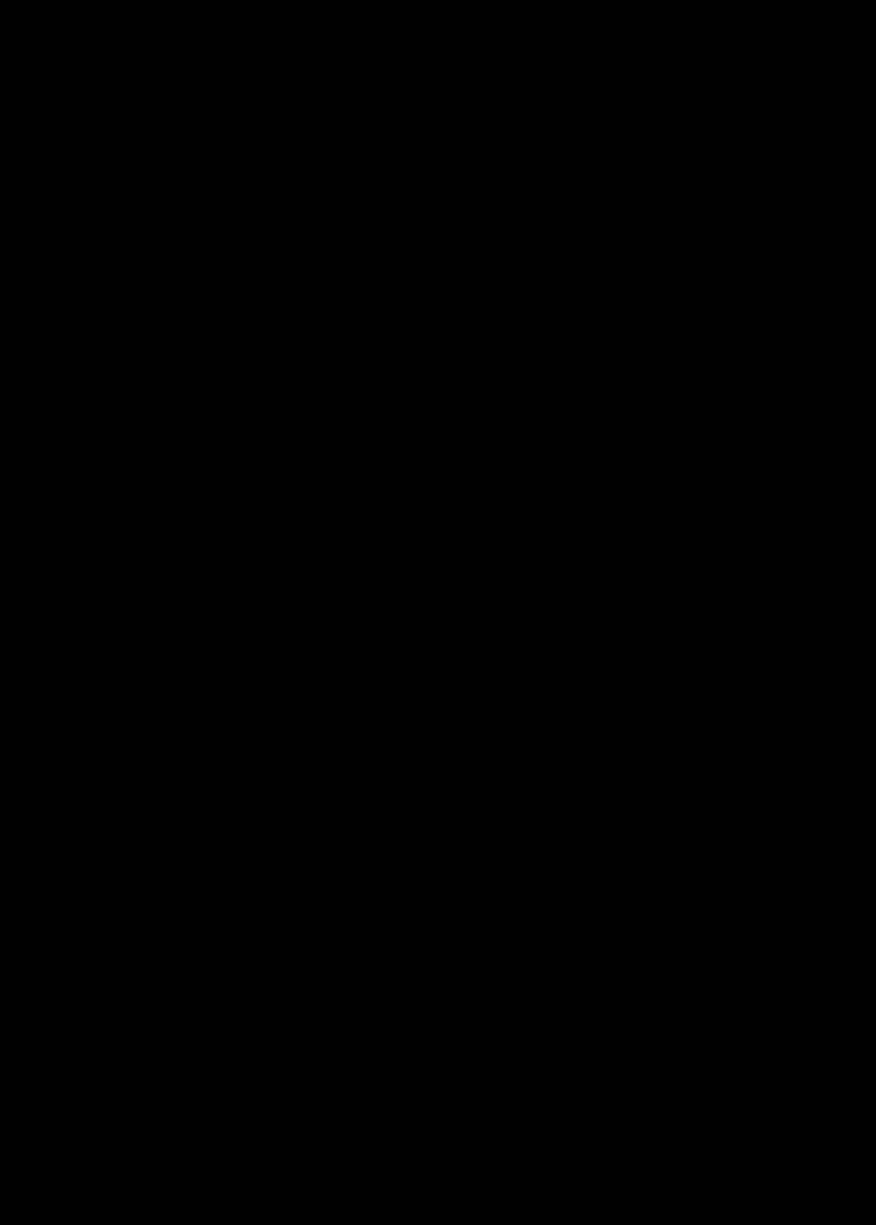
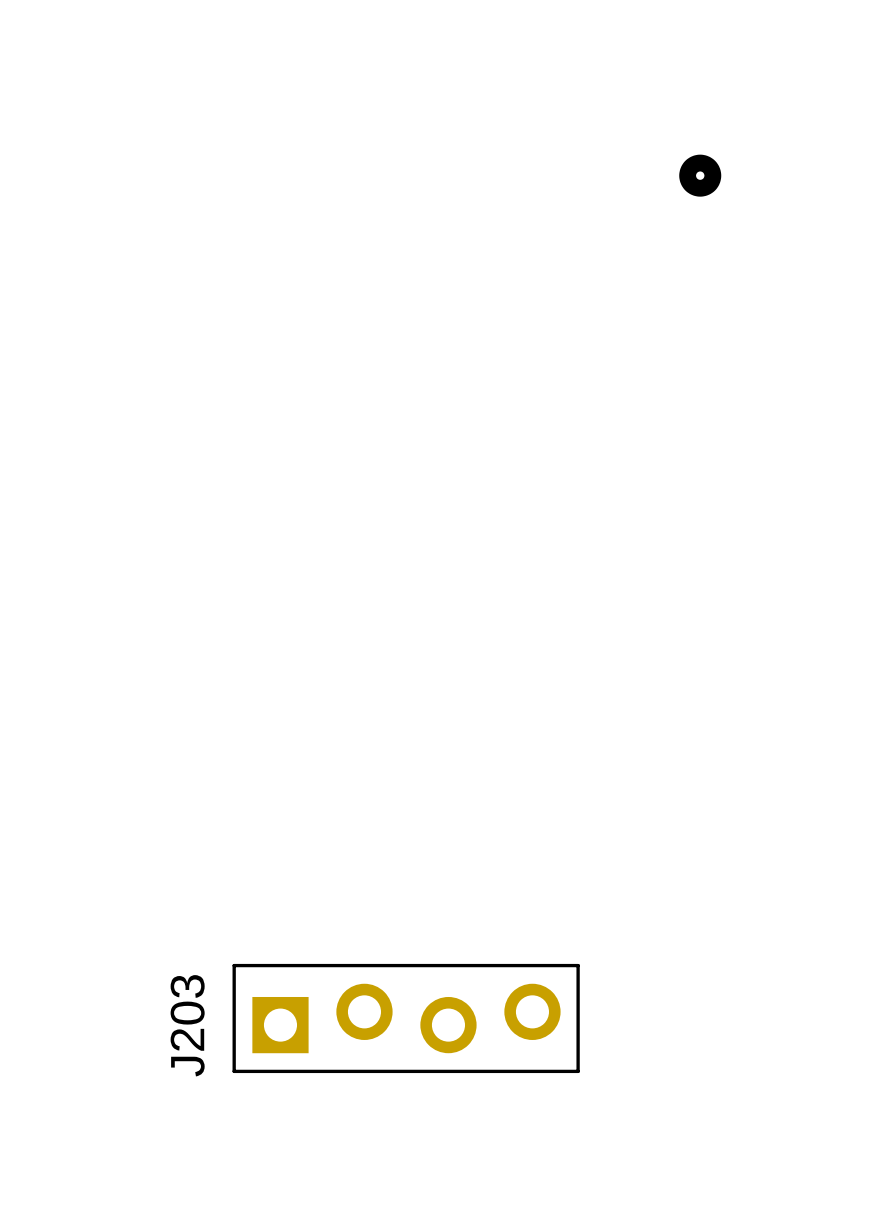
part: none -> (700, 175)
J203: none -> (406, 1018)

